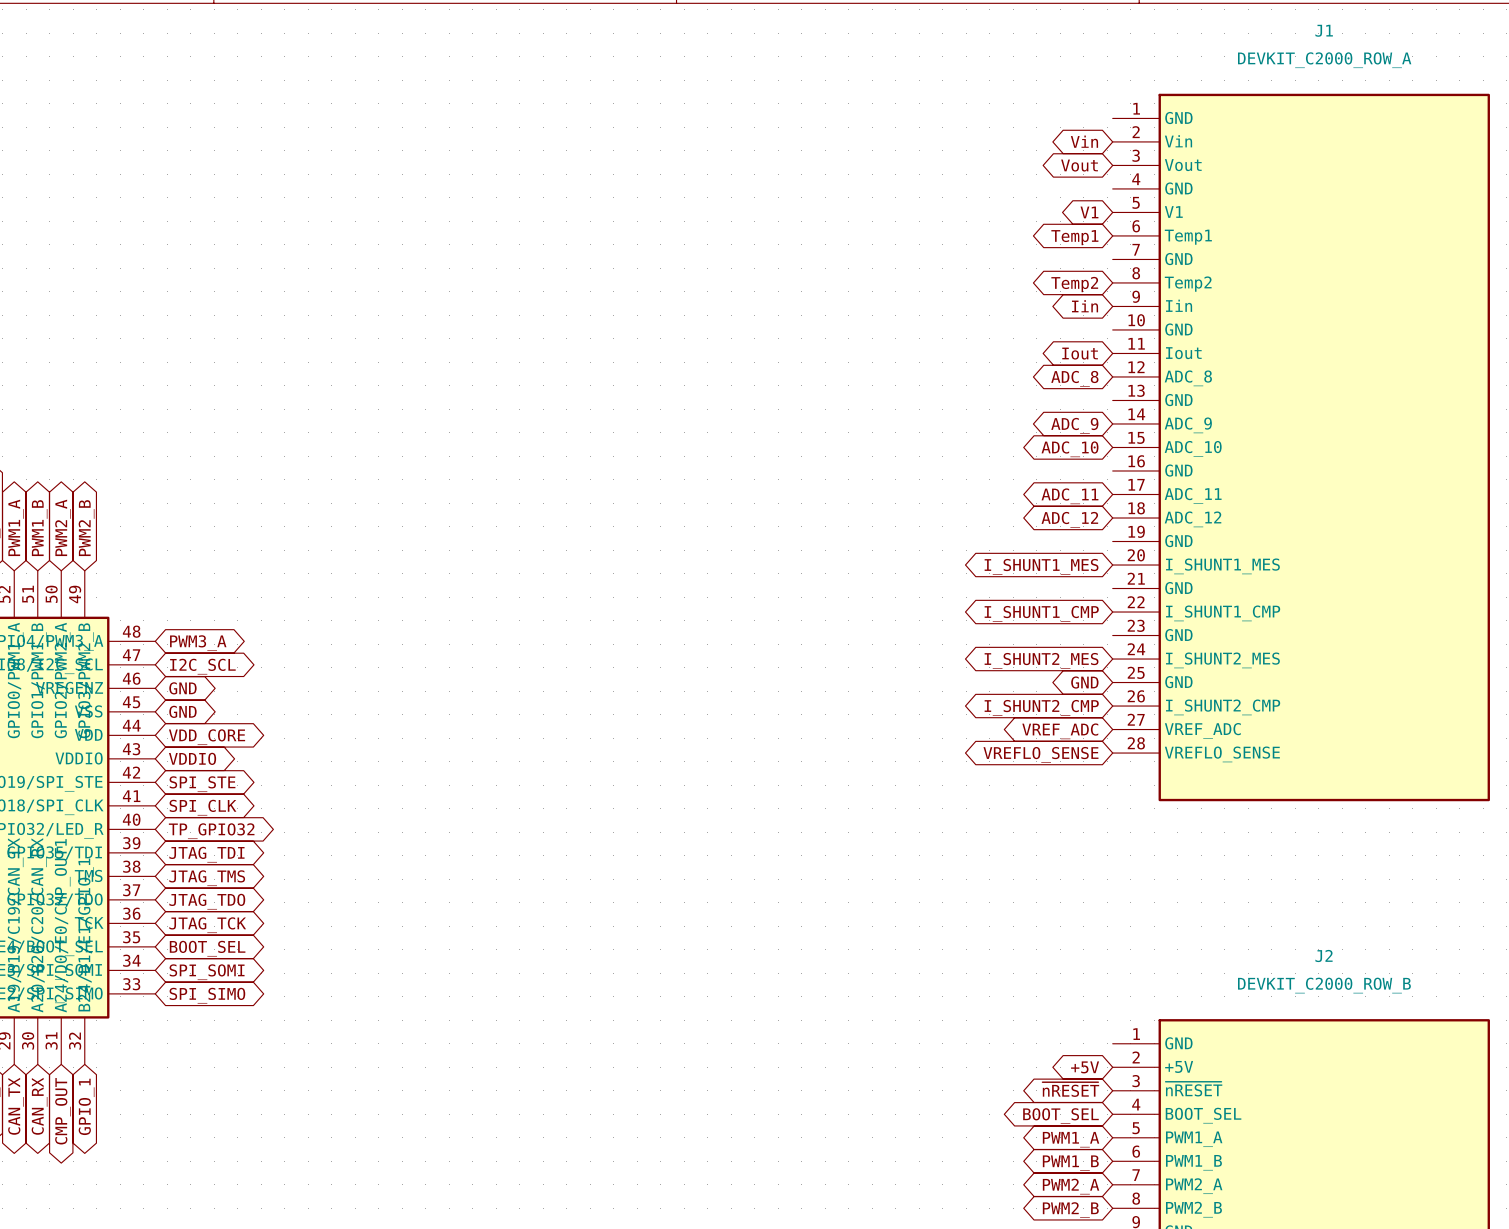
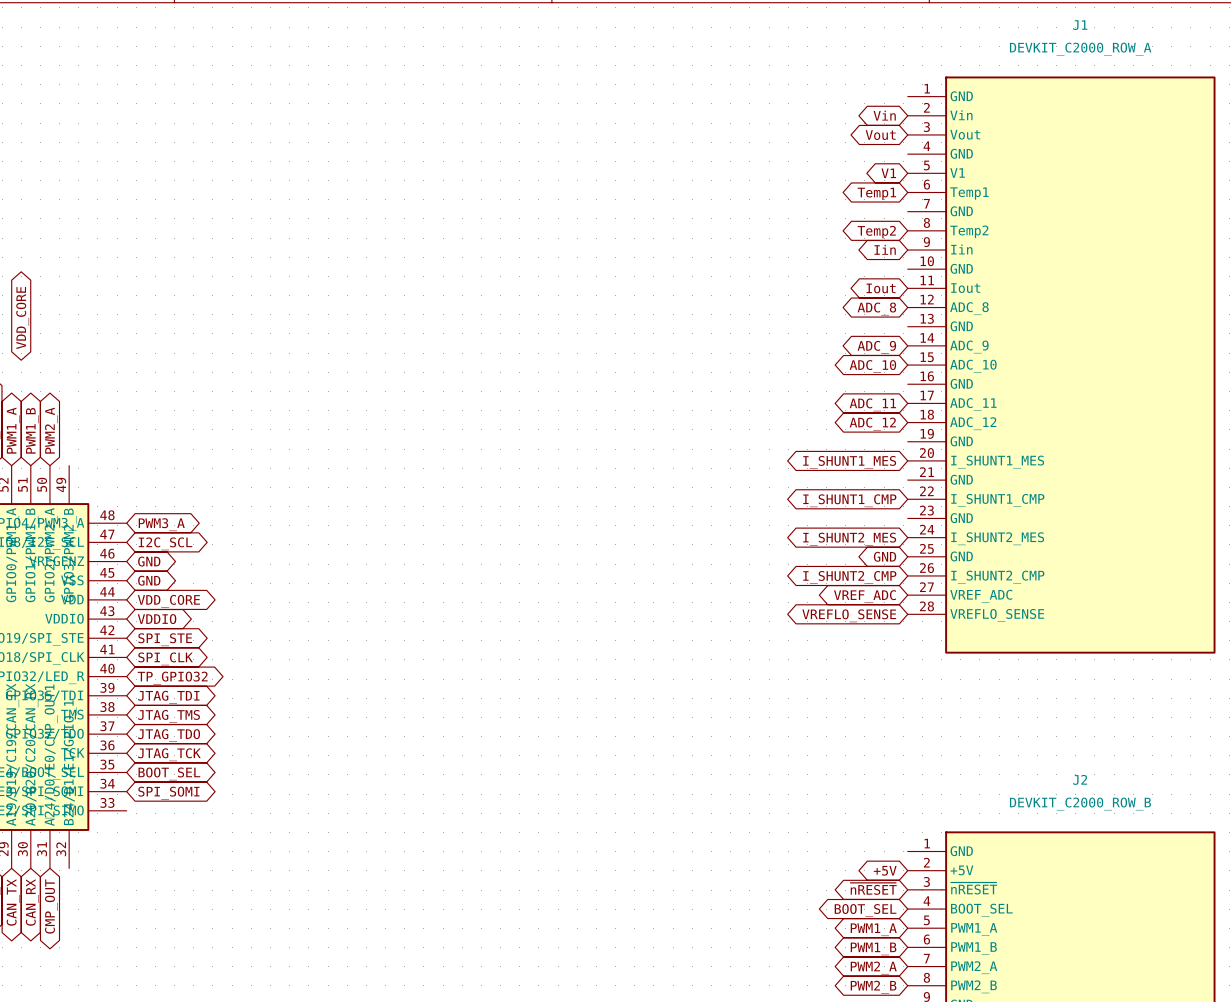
global label: none -> VDD_CORE (22, 318)
global label: PWM2_B (86, 528) -> none
global label: SPI_SIMO (207, 995) -> none
global label: GPIO_1 (86, 1106) -> none

